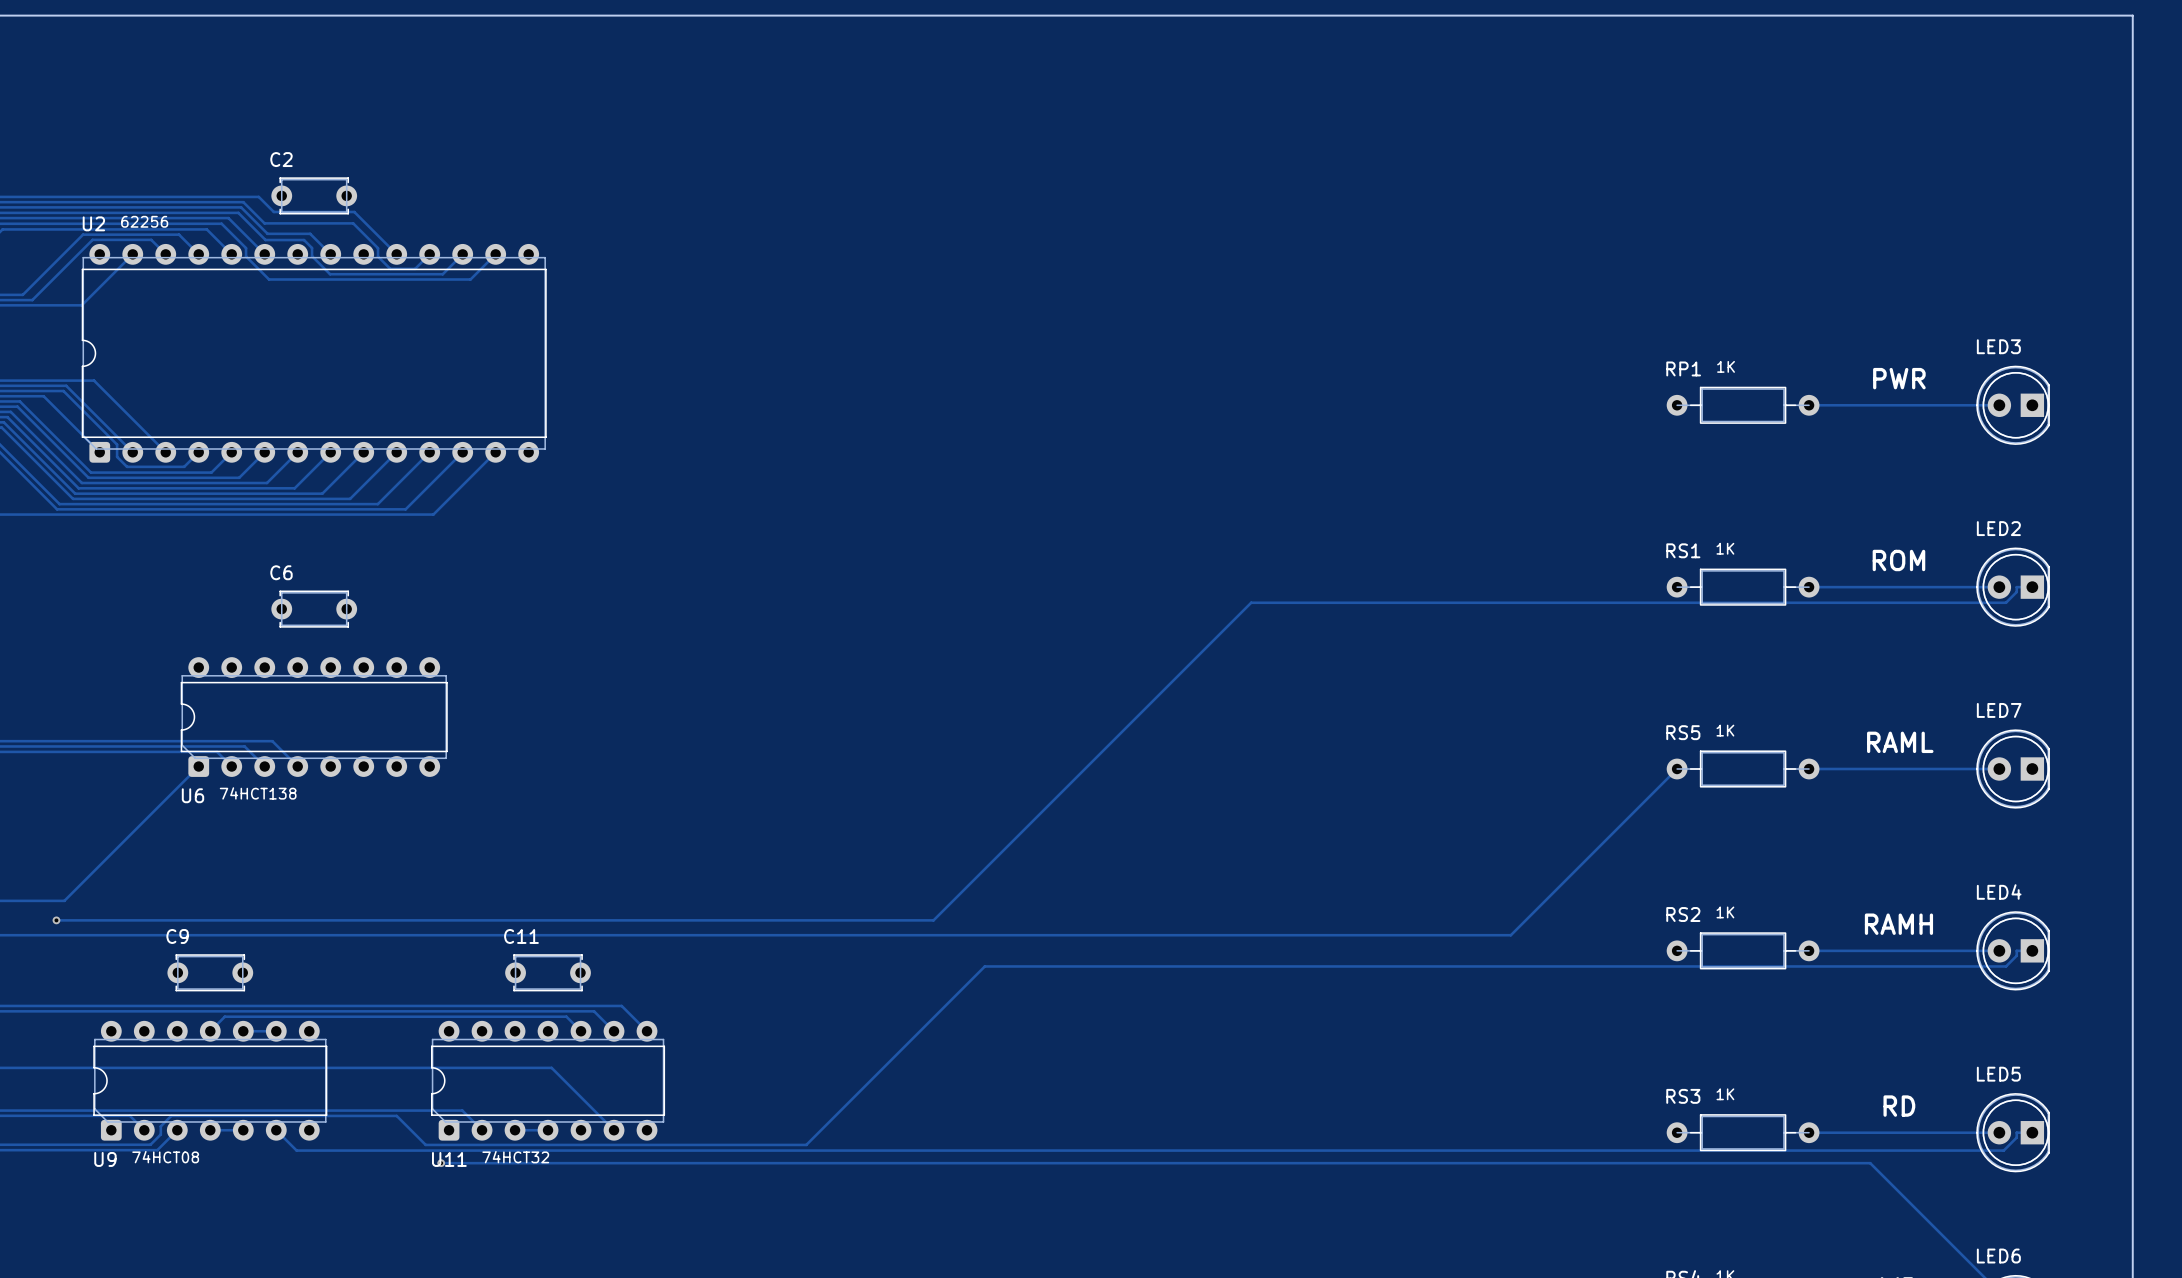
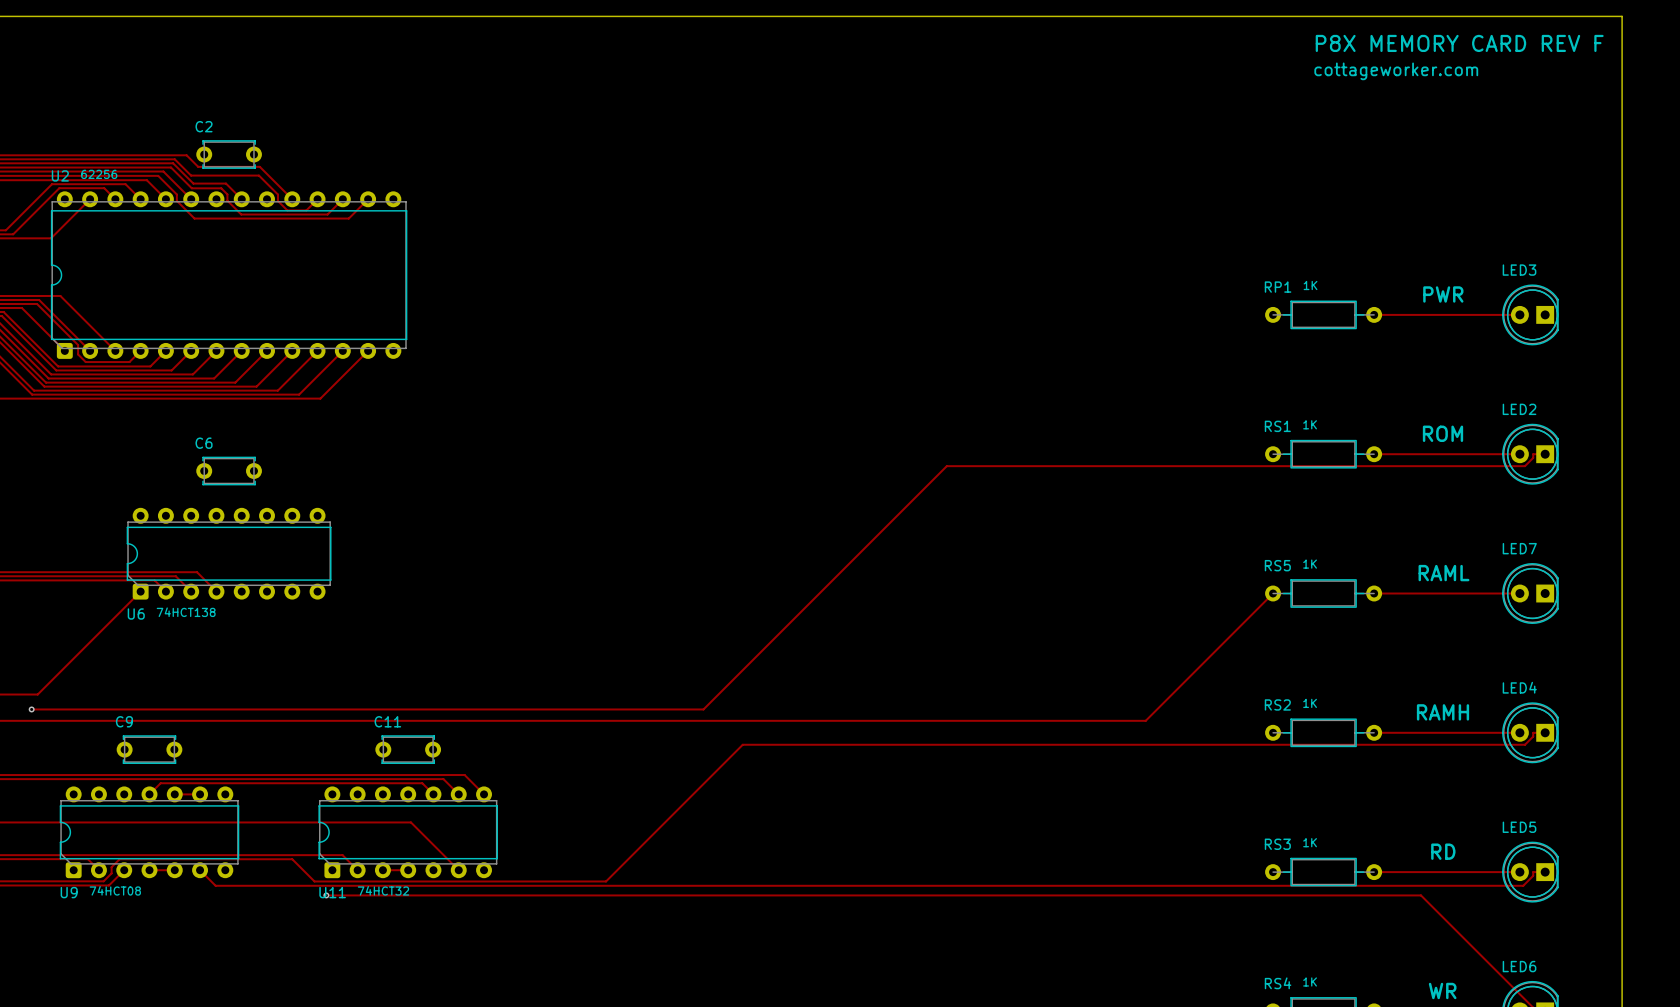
text: none -> P8X MEMORY CARD REV F (1459, 43)
text: none -> cottageworker.com (1396, 71)

